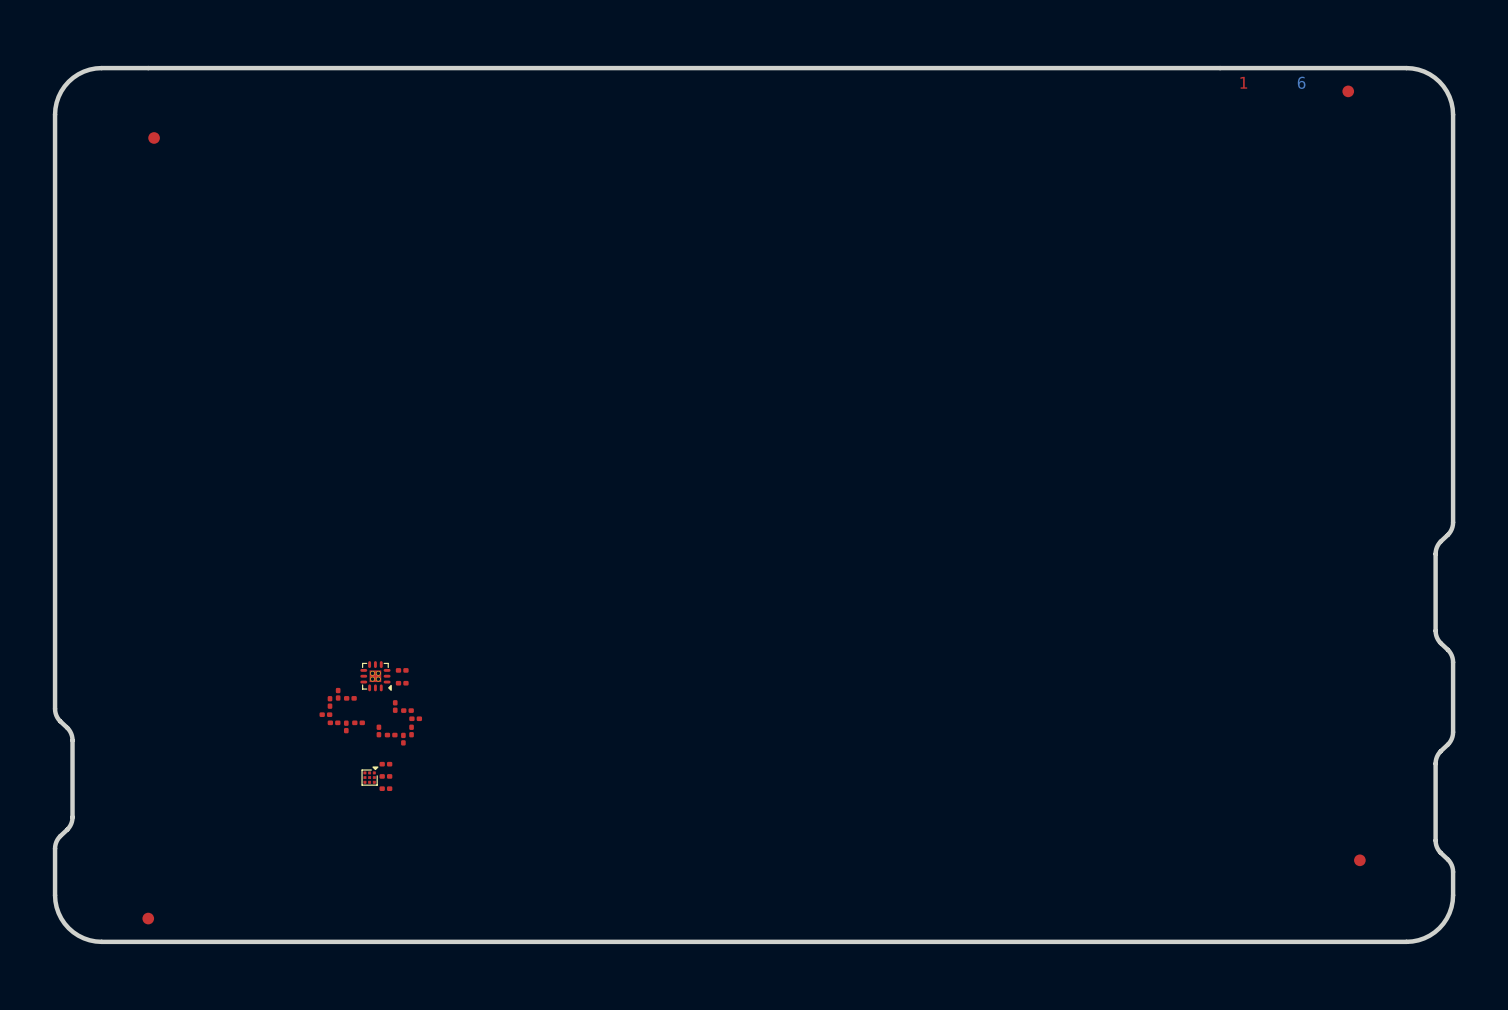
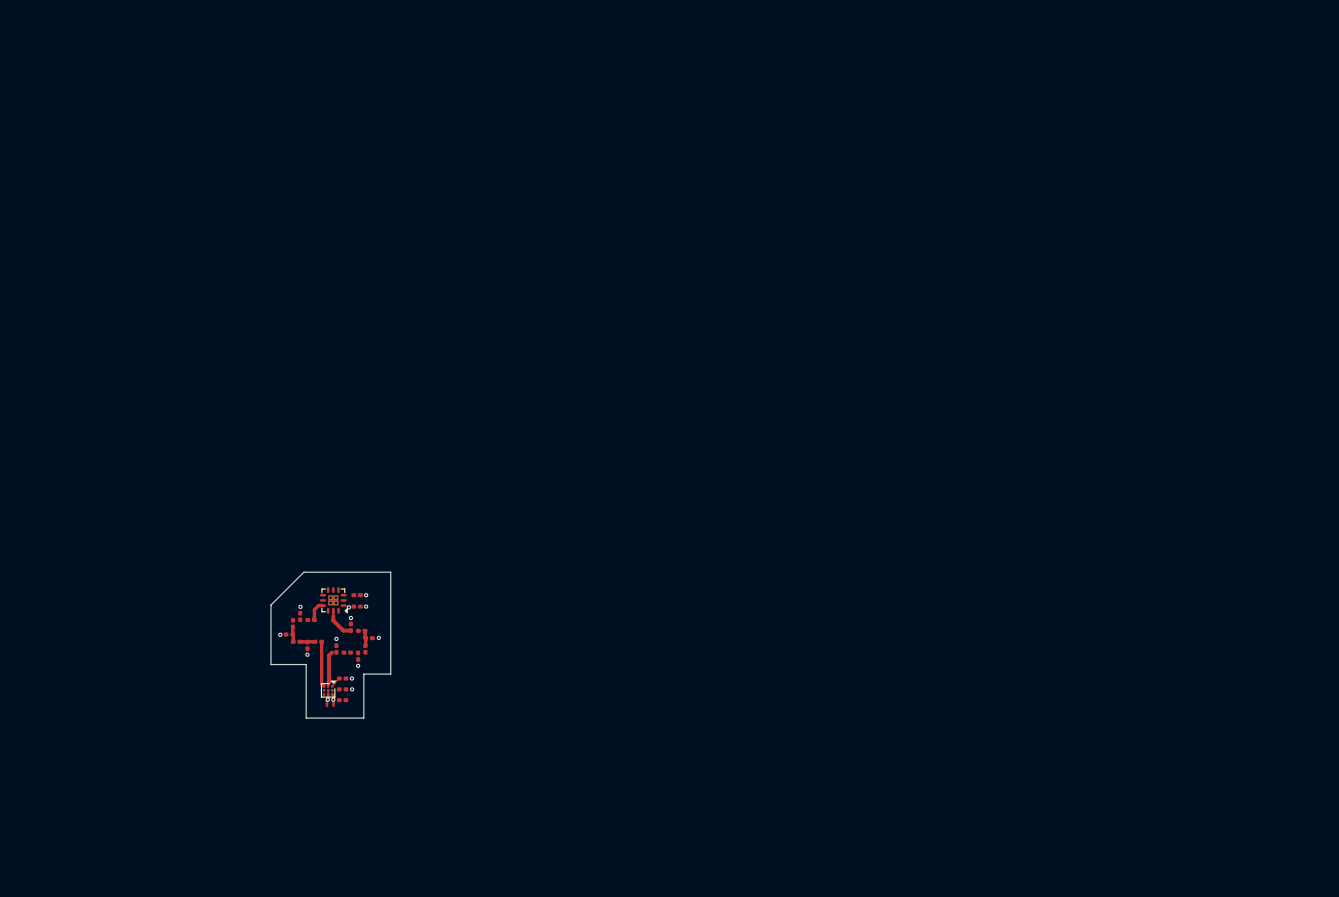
board edge: (101, 68) (1406, 68) (1418, 69) (1429, 74) (1439, 81) (1446, 91) (1451, 102) (1453, 114) (1453, 522) (1450, 531) (1437, 545) (1435, 553) (1435, 633) (1439, 641) (1450, 653) (1453, 662) (1452, 734) (1449, 742) (1437, 754) (1435, 763) (1435, 842) (1439, 851) (1450, 863) (1452, 869) (1452, 901) (1446, 918) (1439, 928) (1429, 935) (1418, 940) (1406, 941) (101, 941) (89, 940) (78, 935) (68, 928) (61, 918) (56, 907) (55, 895) (55, 844) (70, 825) (72, 817) (72, 738) (68, 729) (57, 717) (55, 708) (55, 114) (58, 96) (68, 81) (83, 71) (101, 68) -> none
text: 1 (1243, 82) -> none
text: 6 (1301, 82) -> none
part: (1348, 91) -> none
part: (154, 137) -> none
board edge: none -> (303, 572) (271, 605) (271, 664) (306, 664) (306, 718) (363, 718) (363, 674) (390, 674) (390, 572) (303, 572)
via: none -> (366, 595)
top track: none -> (322, 605) (318, 605) (314, 609) (314, 620)
via: none -> (300, 606)
via: none -> (366, 606)
via: none -> (348, 607)
top track: none -> (333, 610) (333, 620) (343, 630) (350, 630) (348, 630)
via: none -> (350, 617)
top track: none -> (292, 626) (293, 641)
top track: none -> (365, 630) (365, 645)
via: none -> (280, 634)
via: none -> (378, 637)
via: none -> (336, 638)
top track: none -> (299, 641) (315, 641)
top track: none -> (321, 641) (321, 683) (323, 686)
top track: none -> (332, 652) (329, 655) (328, 686)
via: none -> (307, 654)
via: none -> (358, 665)
top track: none -> (339, 678) (332, 686)
via: none -> (351, 678)
via: none -> (352, 689)
top track: none -> (328, 690) (326, 705)
top track: none -> (332, 694) (333, 705)
via: none -> (327, 699)
via: none -> (333, 699)
part: (1359, 860) -> none
part: (148, 918) -> none

